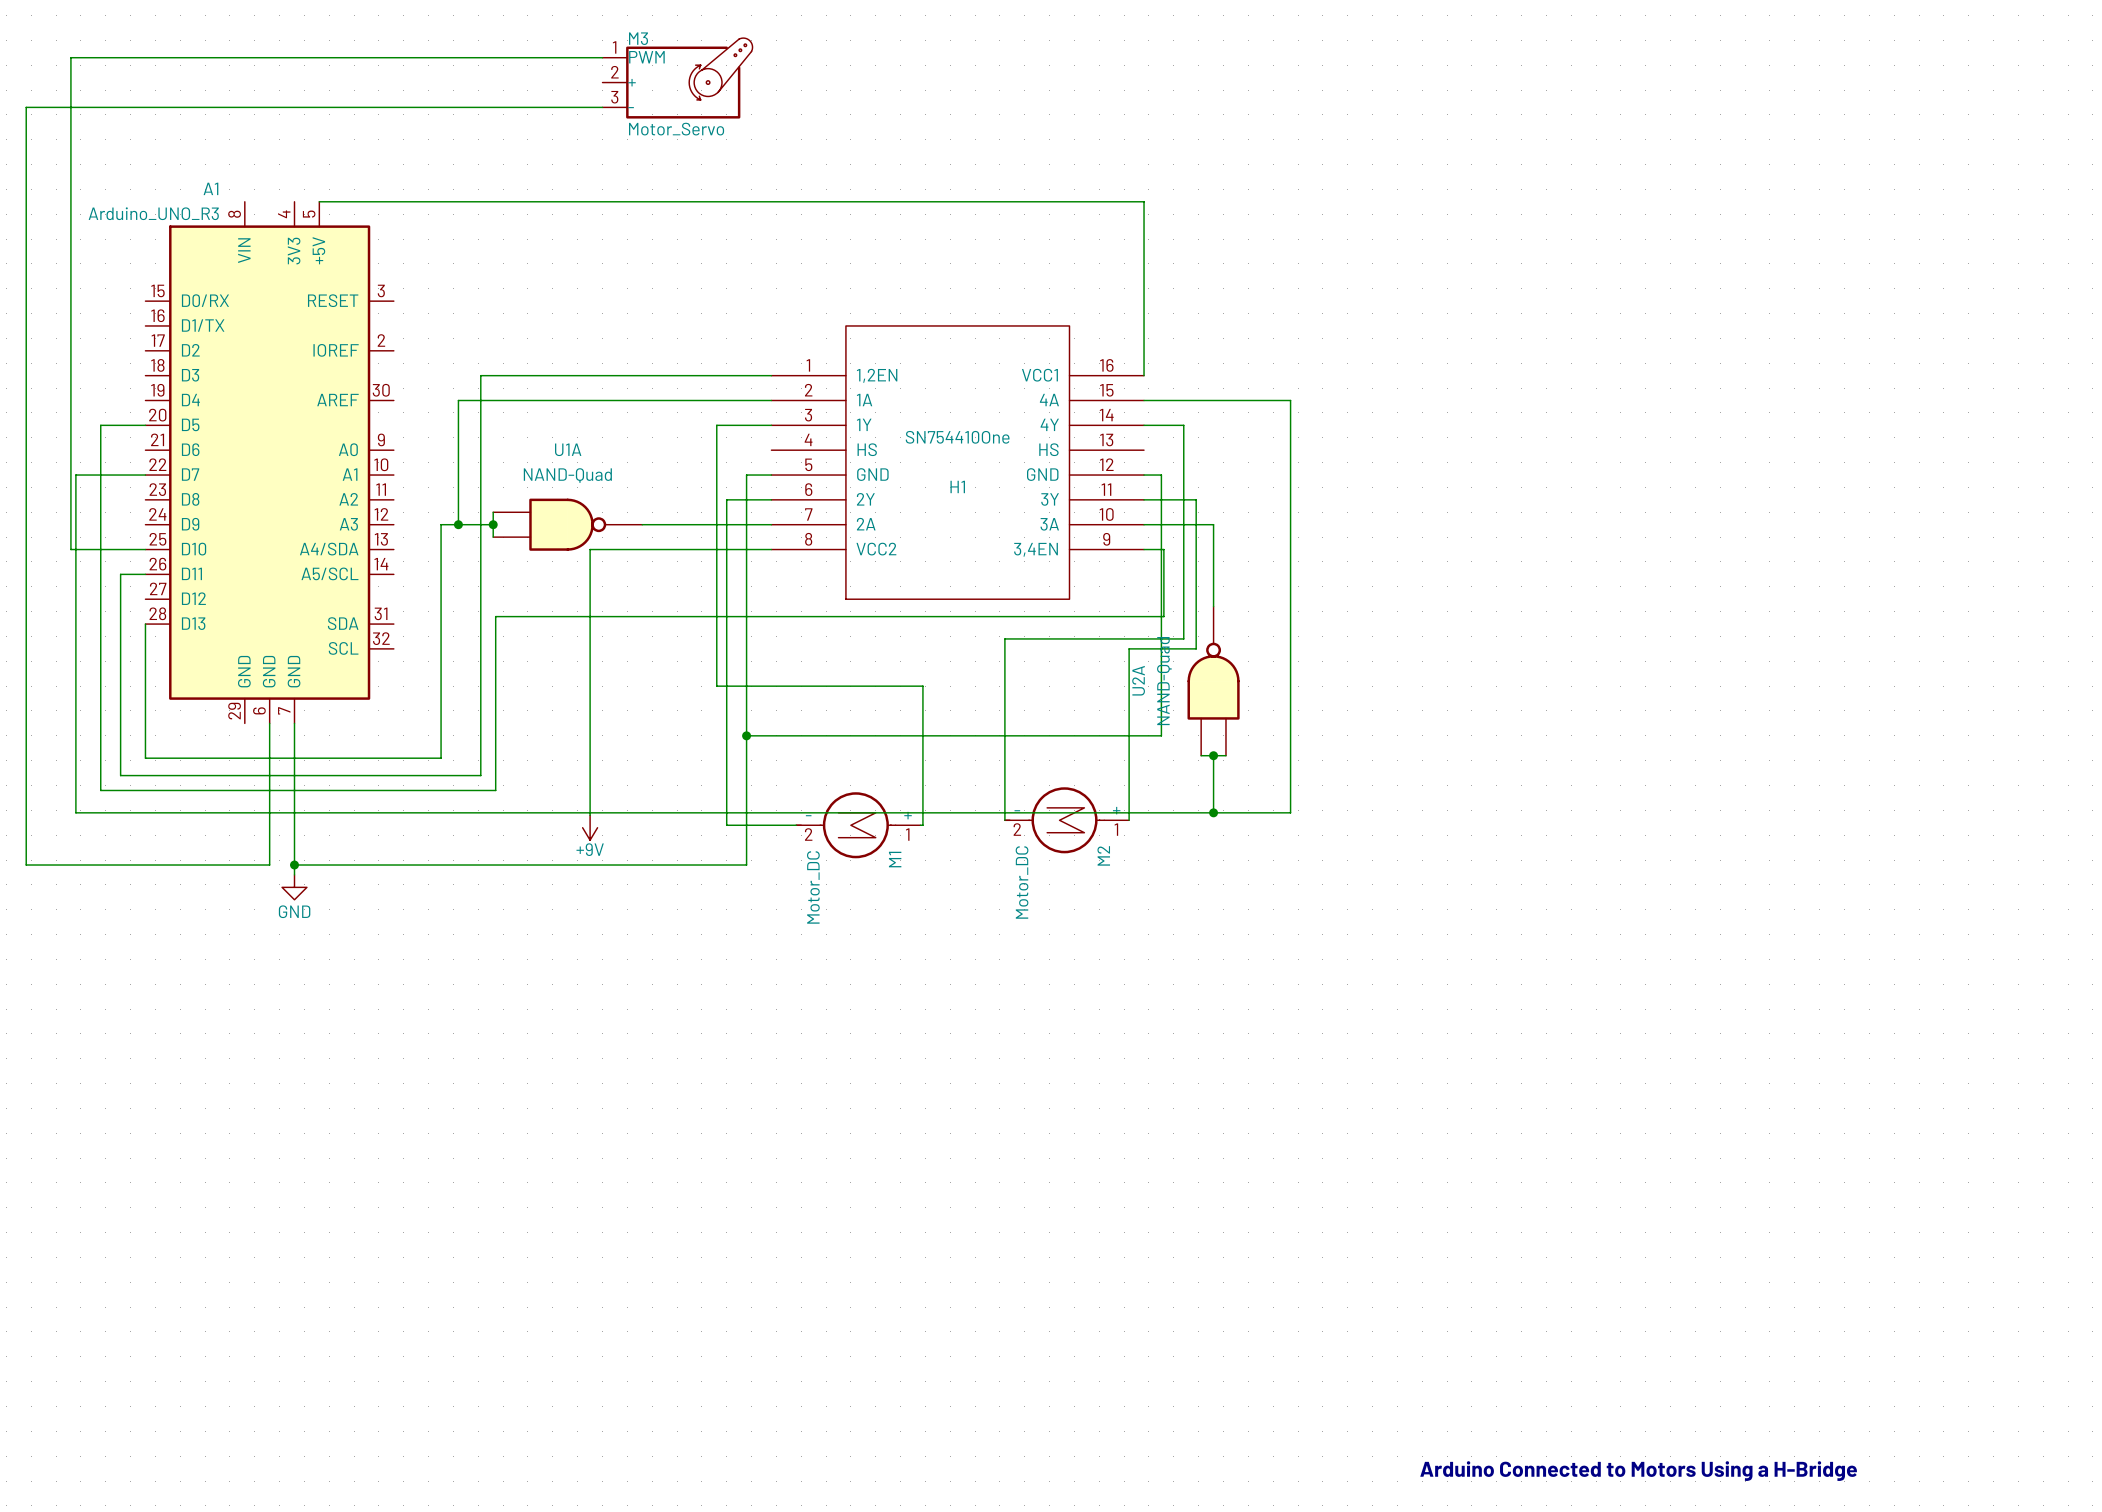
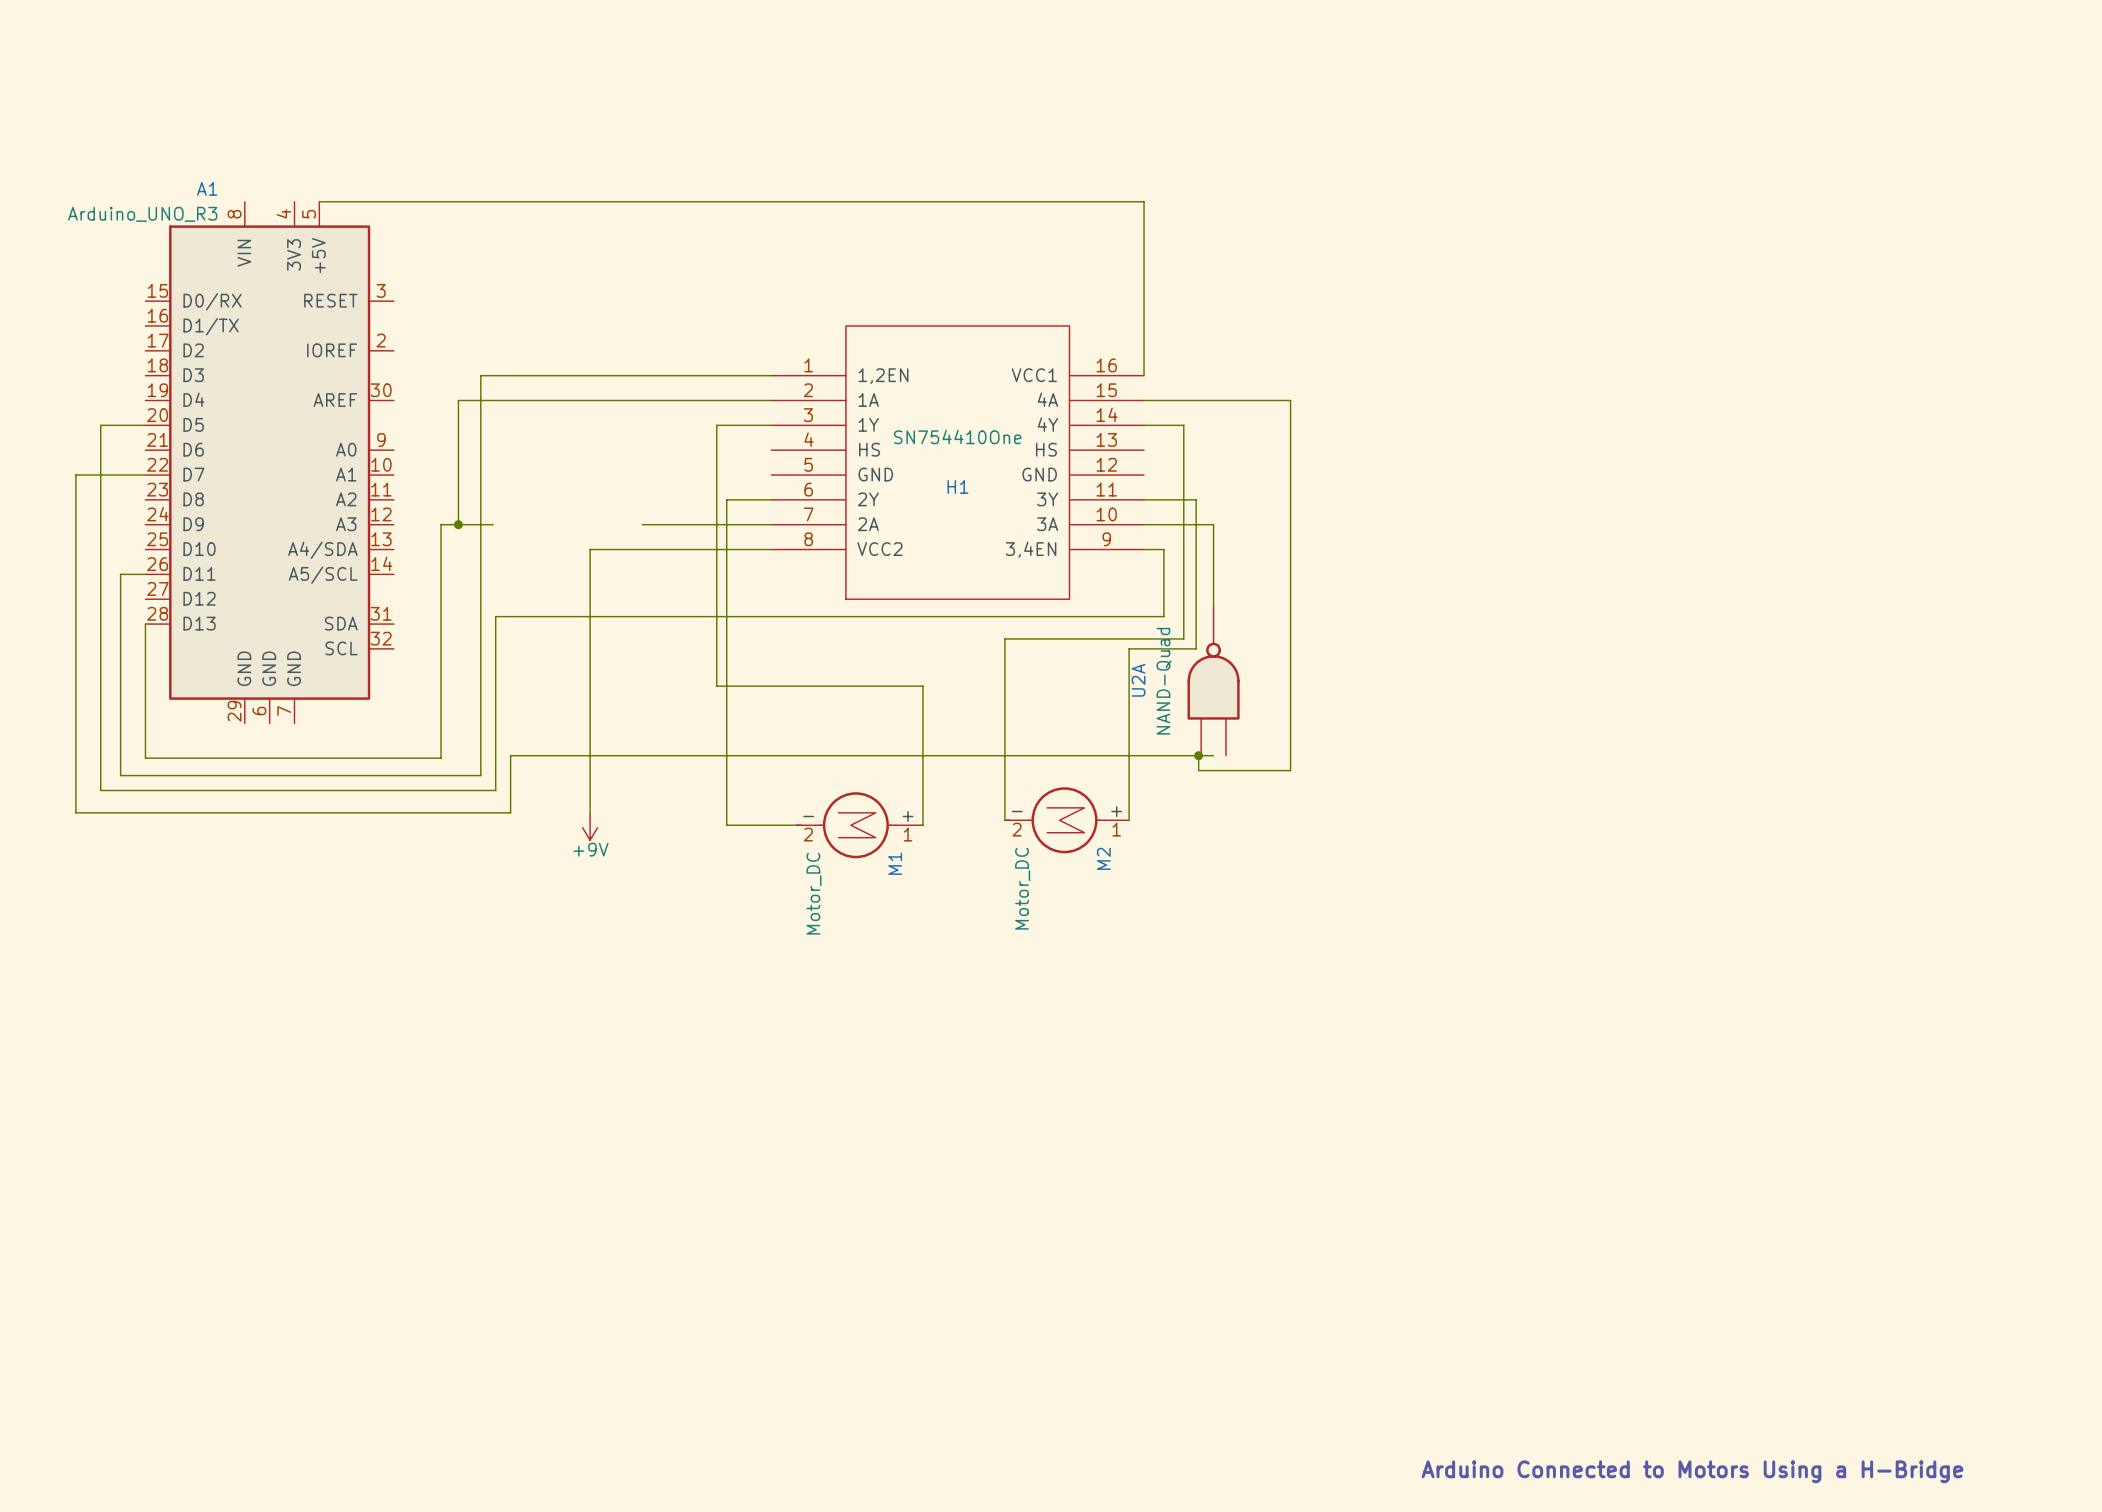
wire: (602, 57) (70, 57) (70, 549) (145, 549) -> none
M3: Motor_Servo (677, 78) -> none
wire: (602, 107) (26, 107) (26, 865) (269, 865) (269, 723) -> none
wire: (771, 475) (746, 475) (746, 865) (294, 865) -> none
wire: (1144, 475) (1161, 475) (1161, 735) (746, 735) -> none
wire: (493, 512) (493, 537) -> none
junction: (493, 524) -> none
U1A: NAND-Quad (567, 524) -> none
wire: (294, 723) (294, 874) -> none
junction: (746, 735) -> none
wire: none -> (1198, 755) (1198, 770) (1290, 770)
junction position: (1213, 755) -> (1198, 755)
wire: (1225, 755) (1213, 755) (1213, 812) -> none
wire: (1290, 770) (1290, 812) (510, 812) -> (1201, 755) (510, 755) (510, 812)
junction: (1213, 812) -> none
junction: (294, 865) -> none
power symbol: GND (294, 887) -> none

